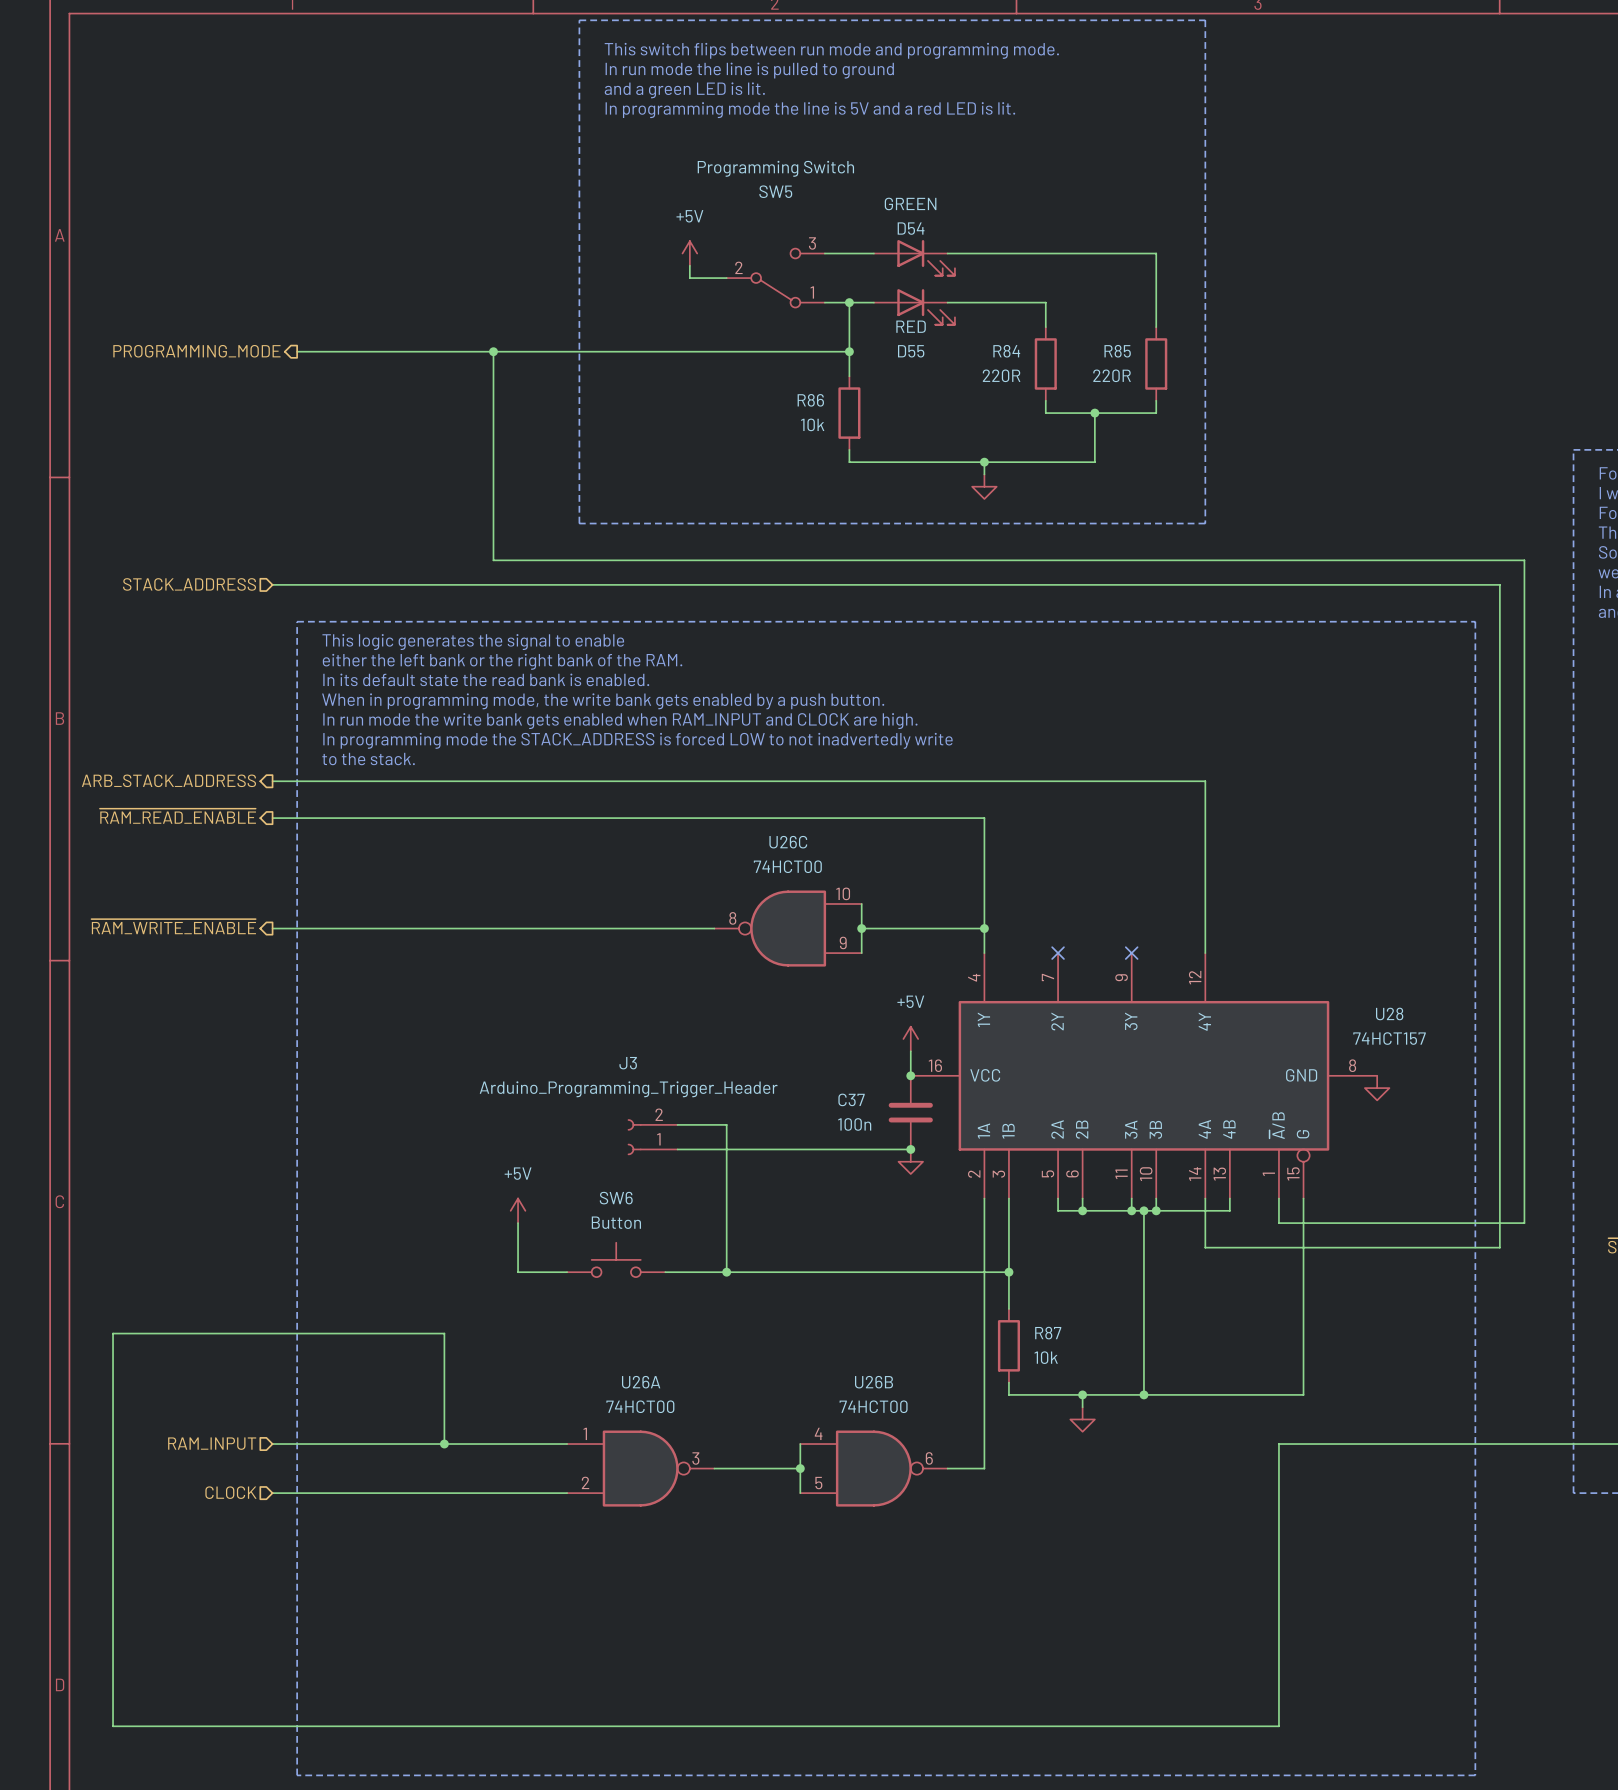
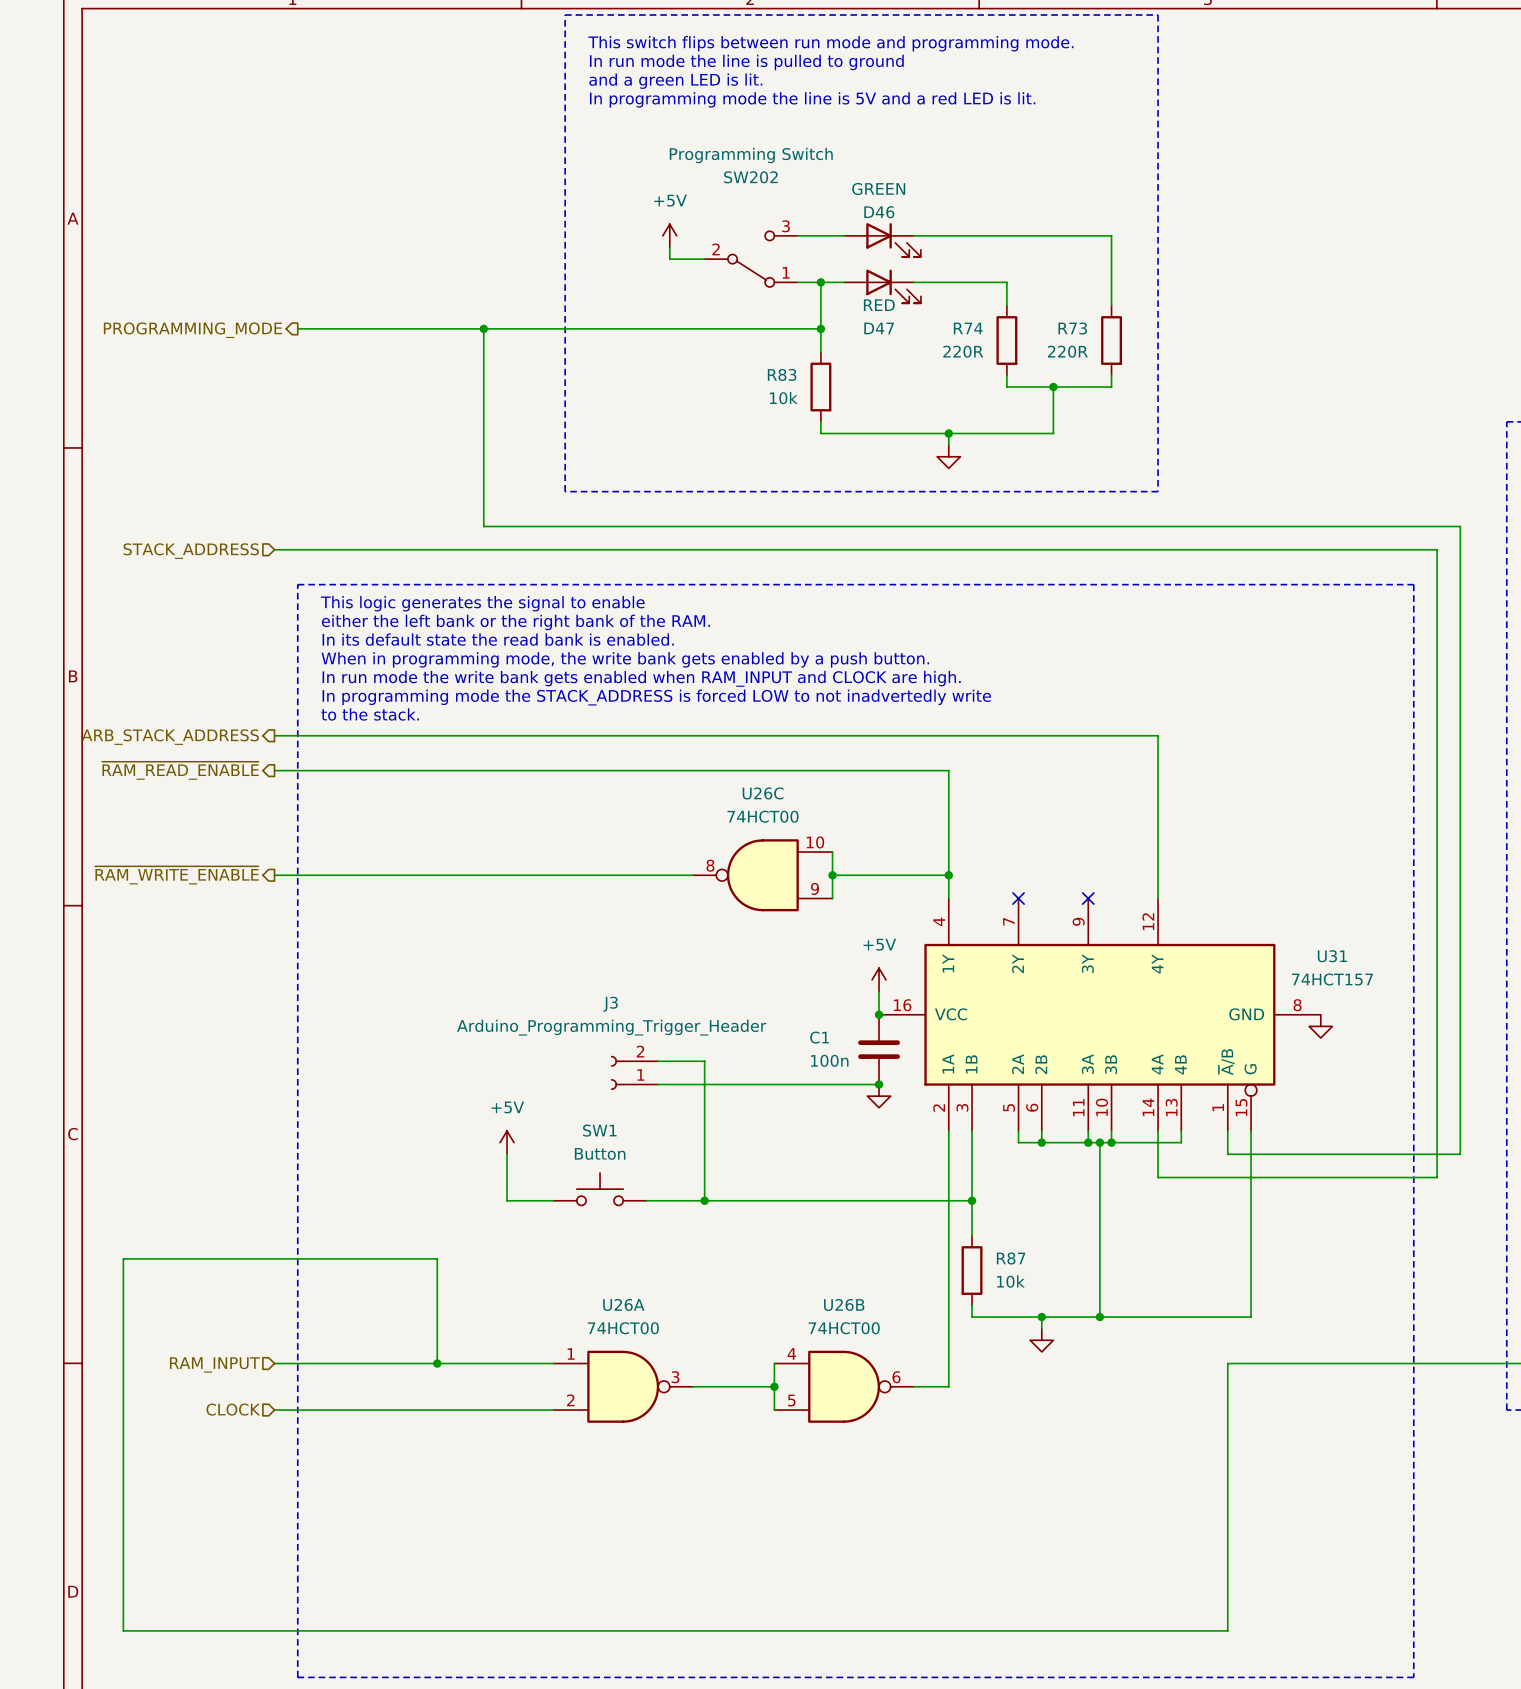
SW5 name: SW5 (775, 191) -> SW202 (750, 177)
D54 name: D54 (911, 228) -> D46 (879, 212)
D55 name: D55 (911, 351) -> D47 (879, 328)
R84 name: R84 (1006, 351) -> R74 (968, 328)
R85 name: R85 (1117, 351) -> R73 (1072, 328)
R86 name: R86 (810, 400) -> R83 (782, 374)
U28 name: U28 (1389, 1013) -> U31 (1332, 956)
C37 name: C37 (851, 1099) -> C1 (819, 1037)
SW6 name: SW6 (616, 1198) -> SW1 (599, 1130)

